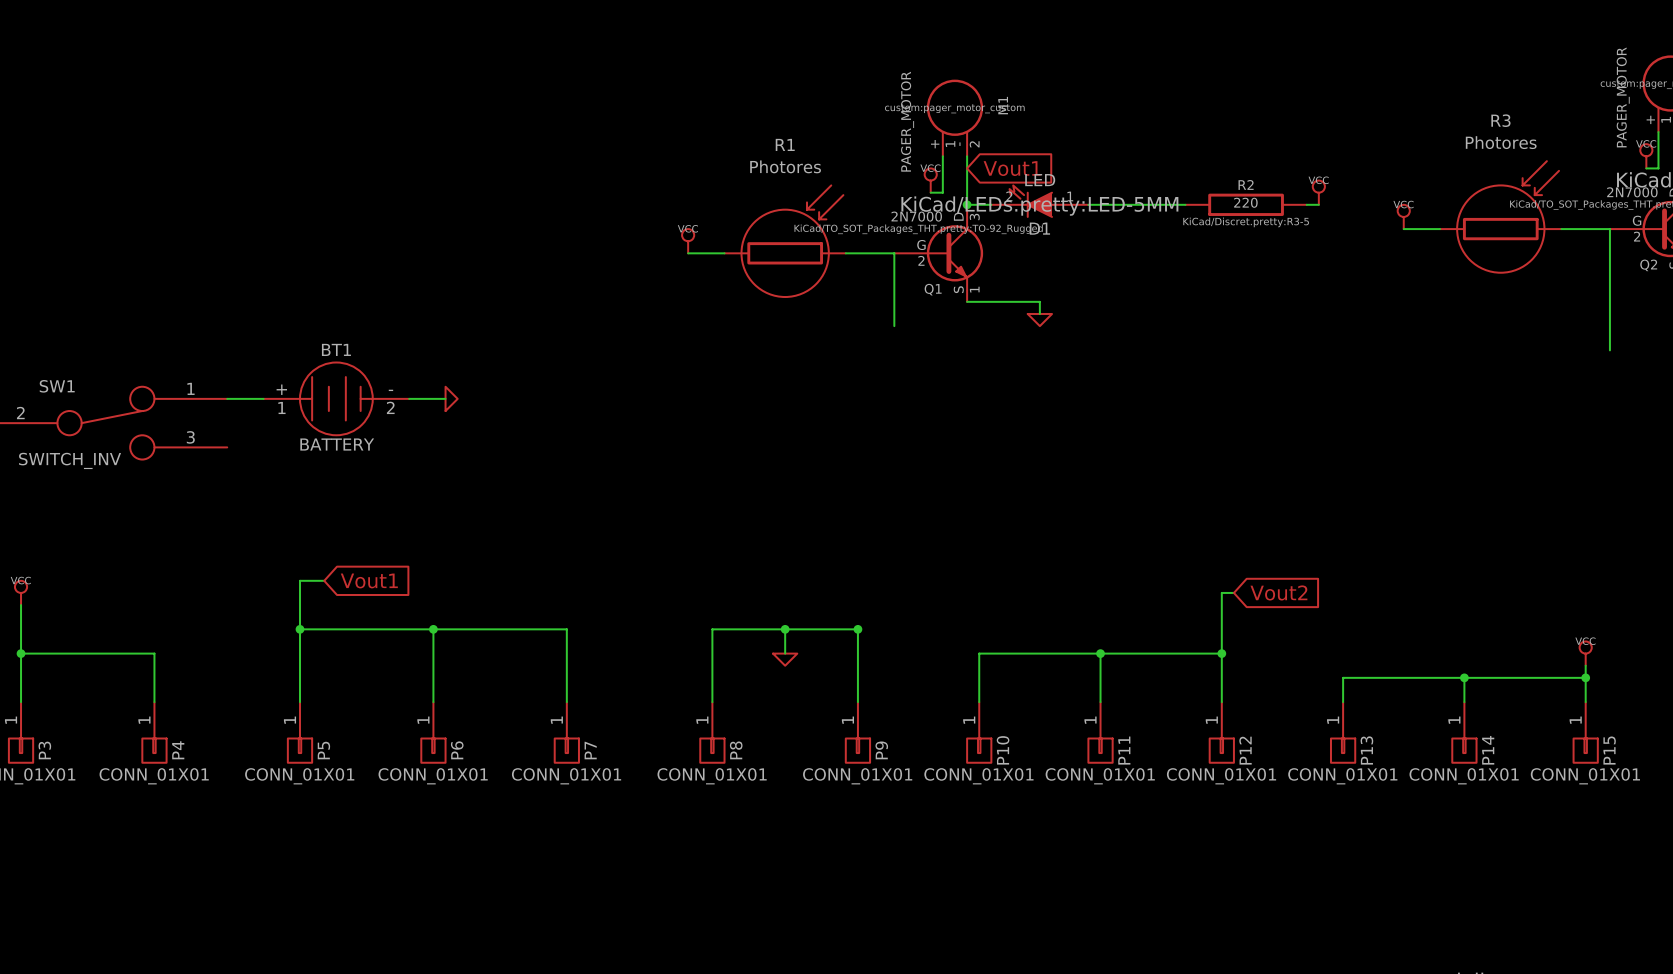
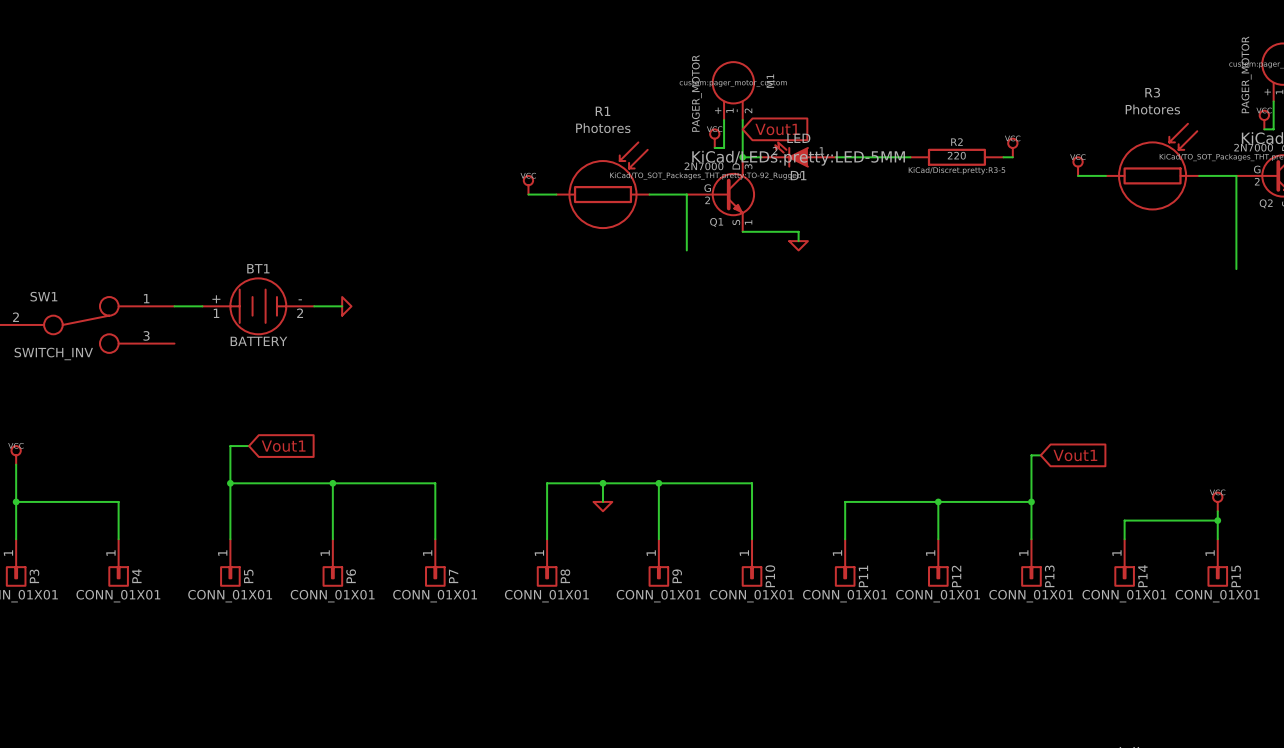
wire: (1233, 592) (1221, 592) (1221, 653) -> (1031, 501) (938, 501)
global label: Vout2 (1278, 592) -> none
global label: none -> Vout1 (1075, 455)
wire: (979, 653) (1100, 653) -> (752, 501) (752, 483) (658, 483)
junction: (1100, 653) -> none
junction: none -> (1031, 501)
wire: (1343, 677) (1464, 677) -> (1031, 520) (1031, 455) (1040, 455)
junction: (1464, 677) -> none

